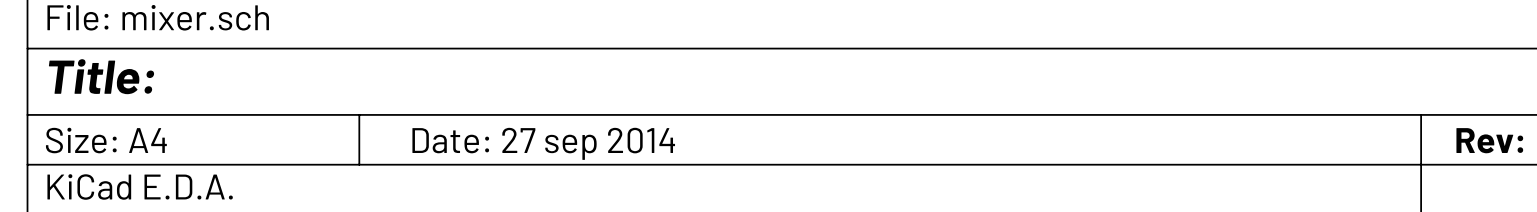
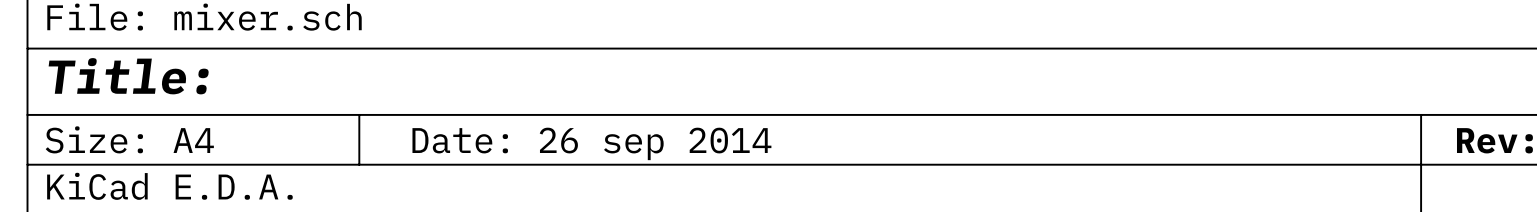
title block: Date: 27 sep 2014 (543, 143) -> Date: 26 sep 2014 (591, 143)

